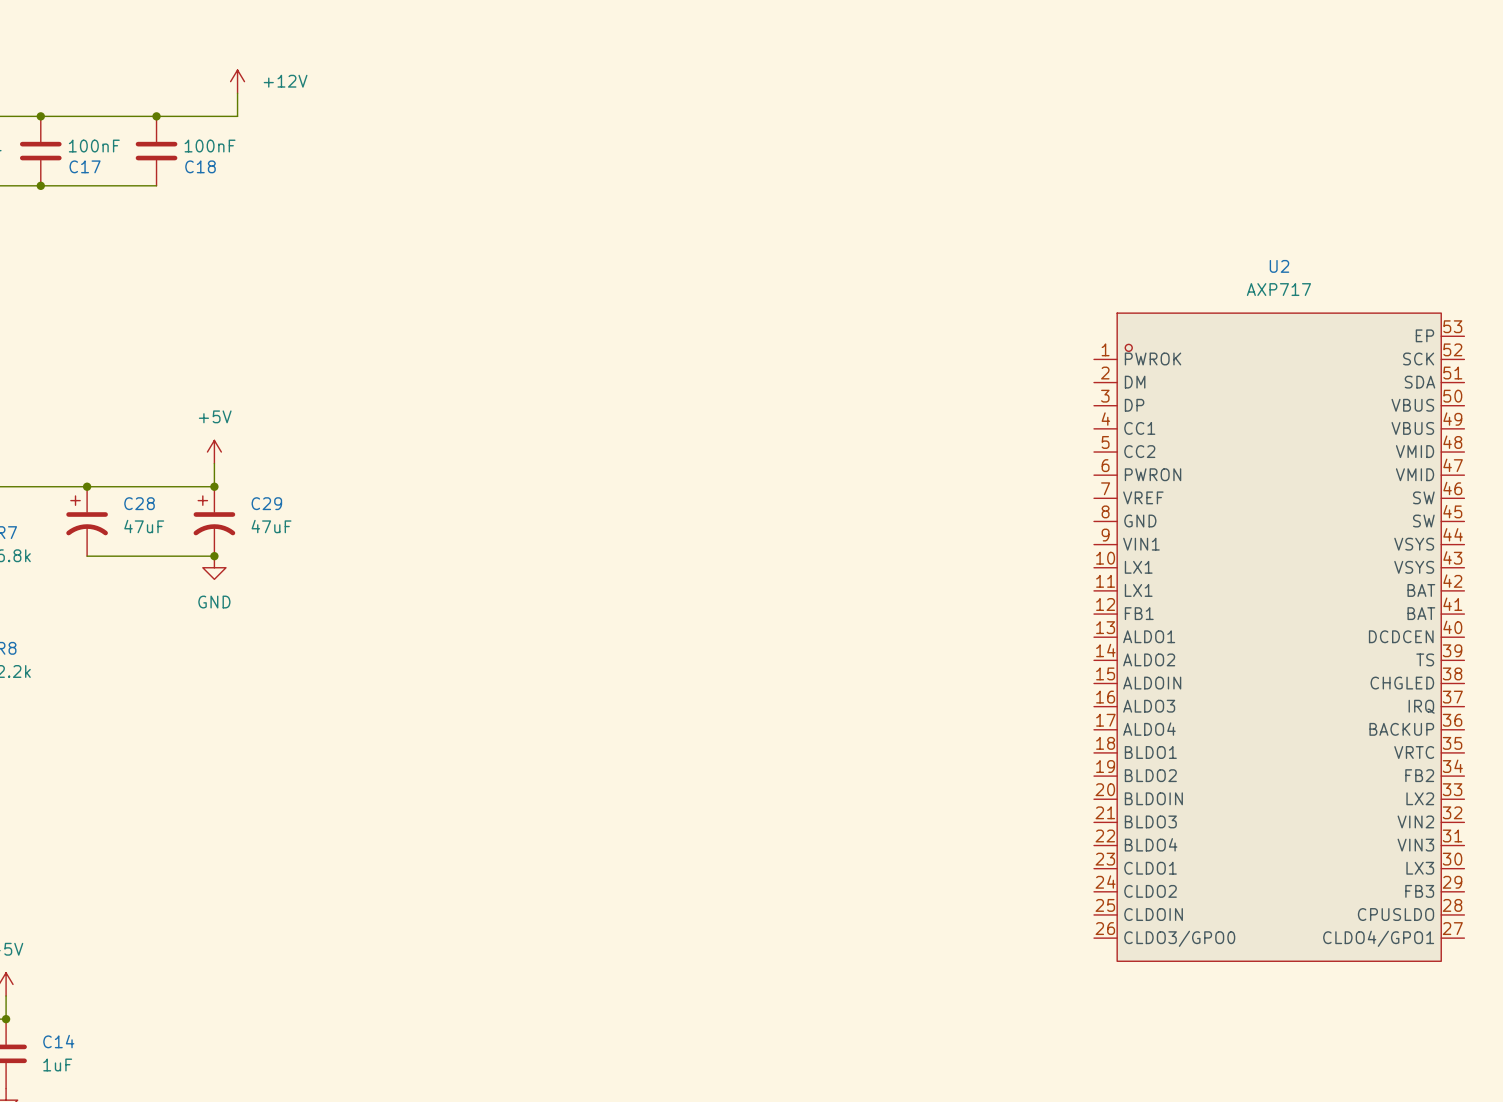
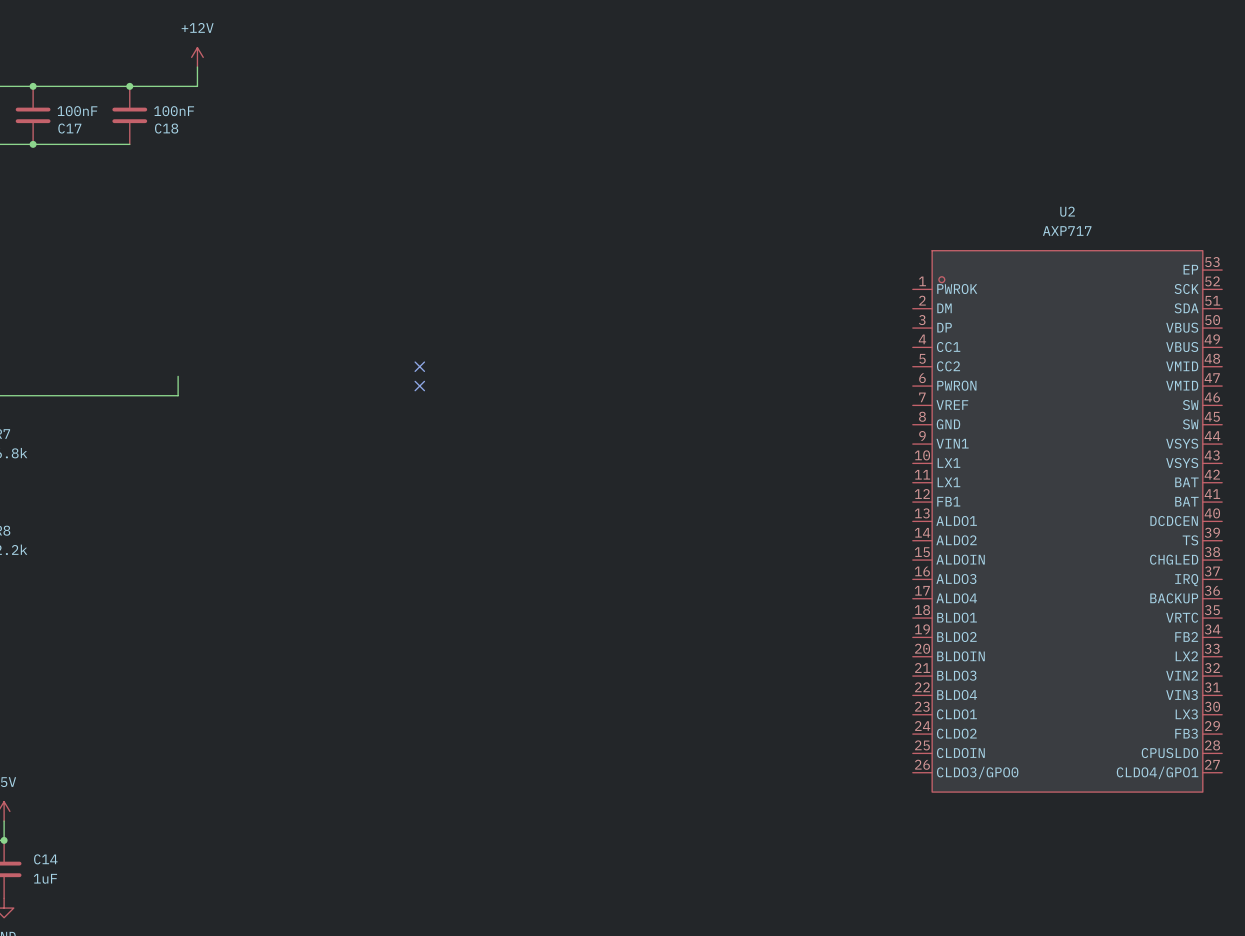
power symbol text position: +12V (285, 81) -> +12V (197, 27)
power symbol: +5V (214, 452) -> none
no-connect mark: none -> (419, 366)
no-connect mark: none -> (419, 386)
junction: (87, 486) -> none
junction: (214, 486) -> none
C28: 47uF (87, 521) -> none
C29: 47uF (214, 521) -> none
wire: (87, 556) (214, 556) -> none
junction: (214, 556) -> none
power symbol: GND (214, 567) -> none

